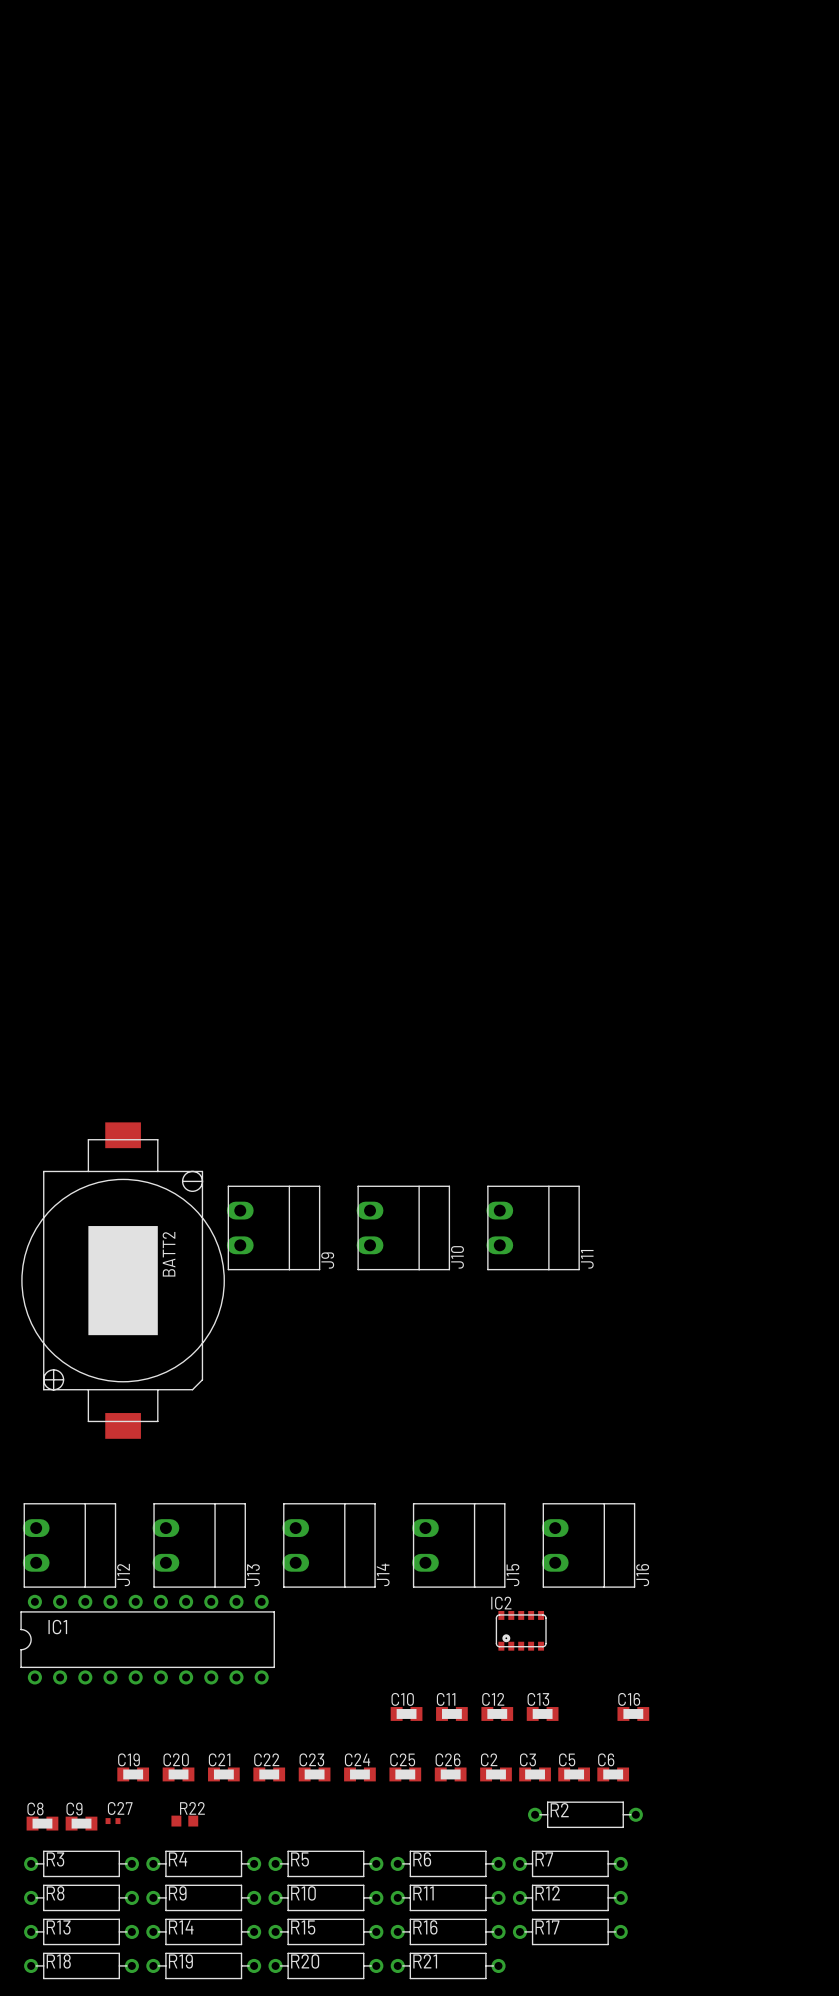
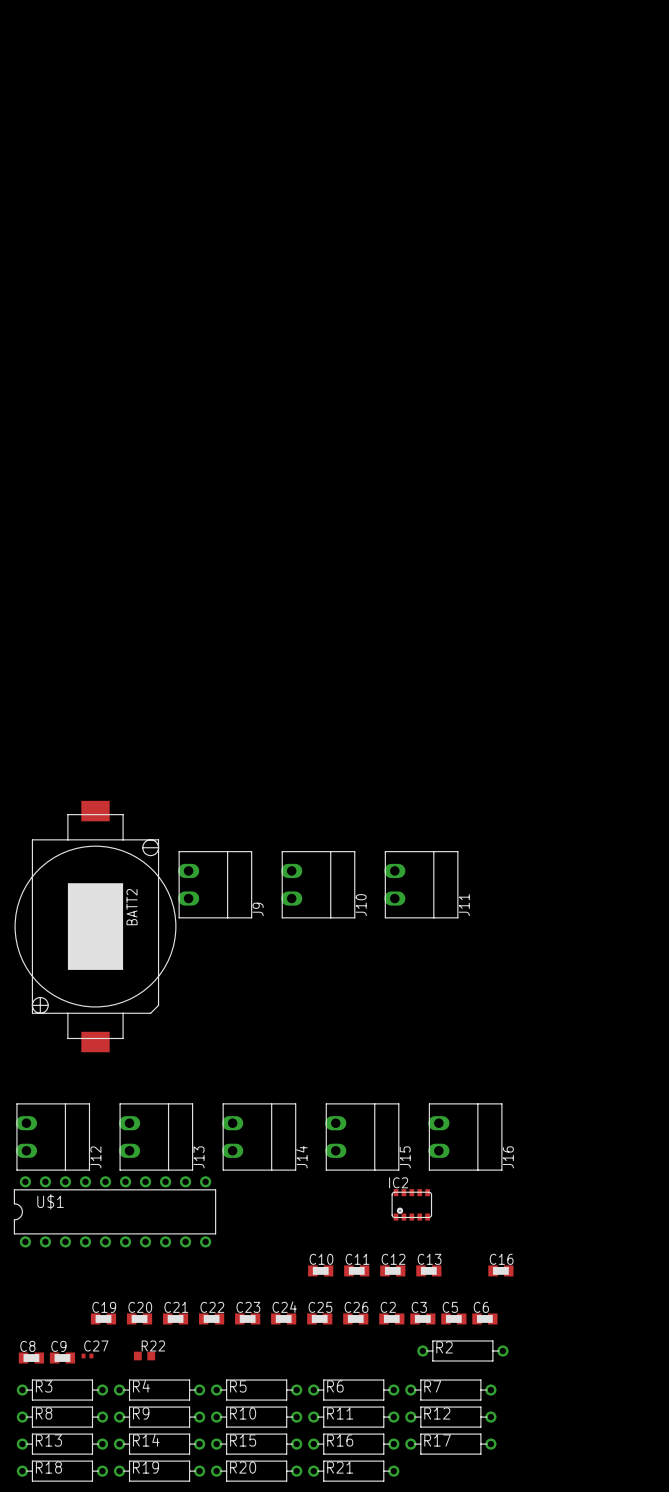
IC1 name: IC1 (57, 1627) -> U$1 (50, 1201)

